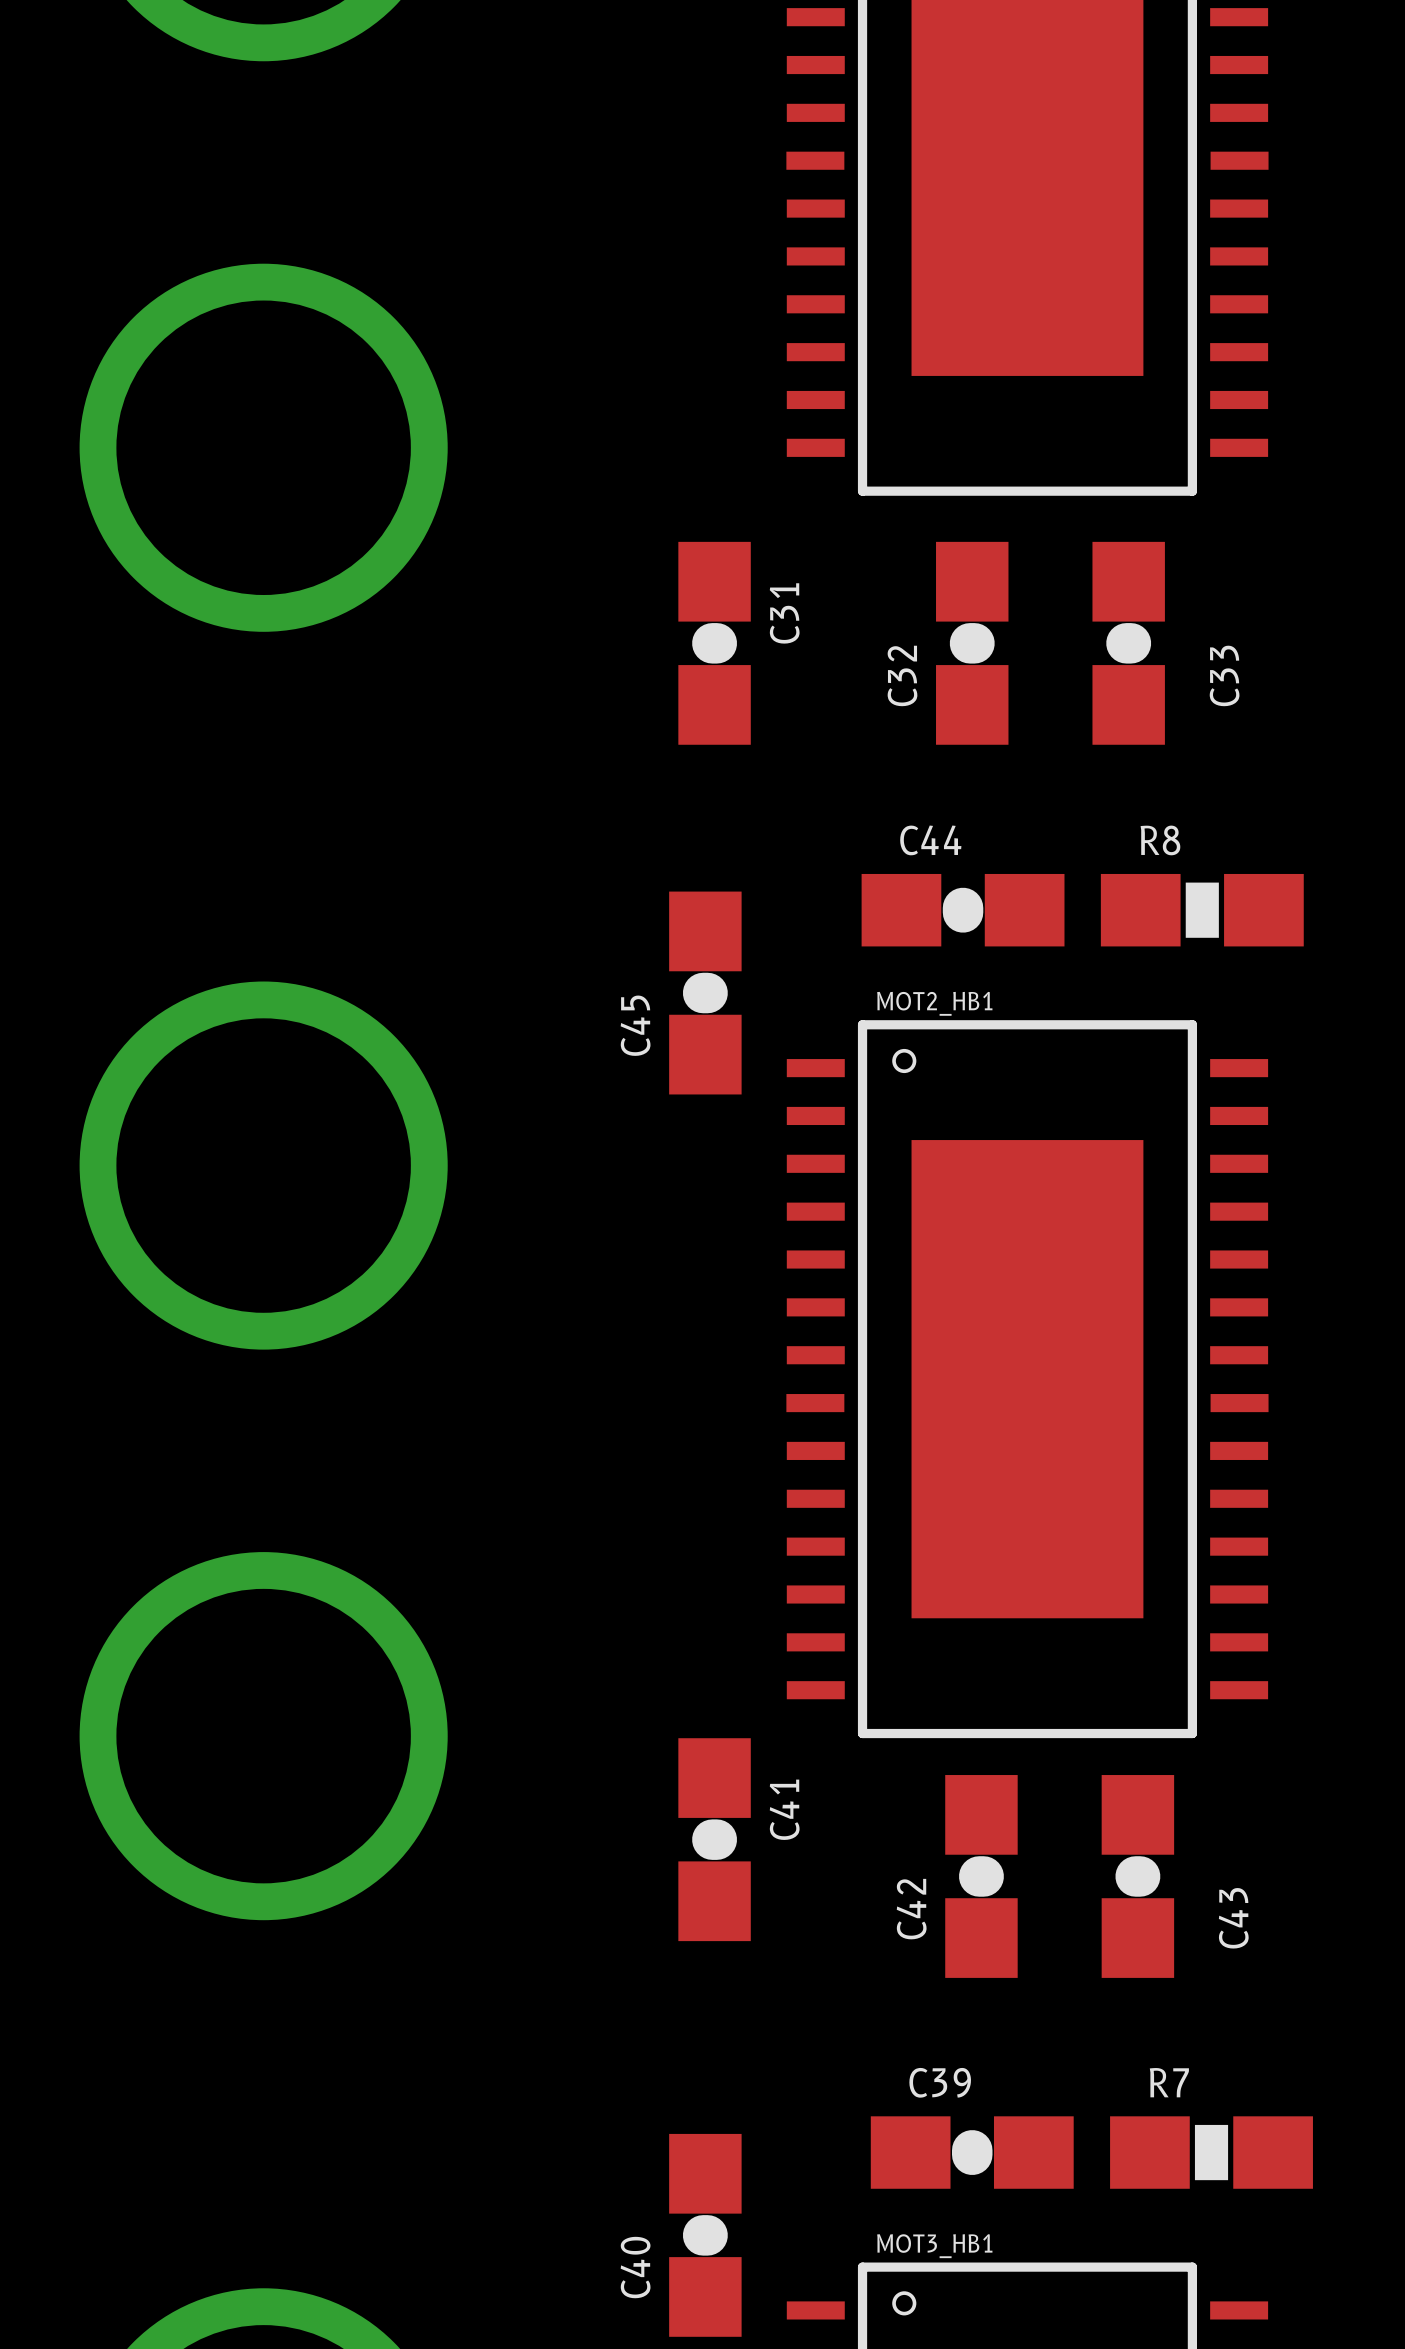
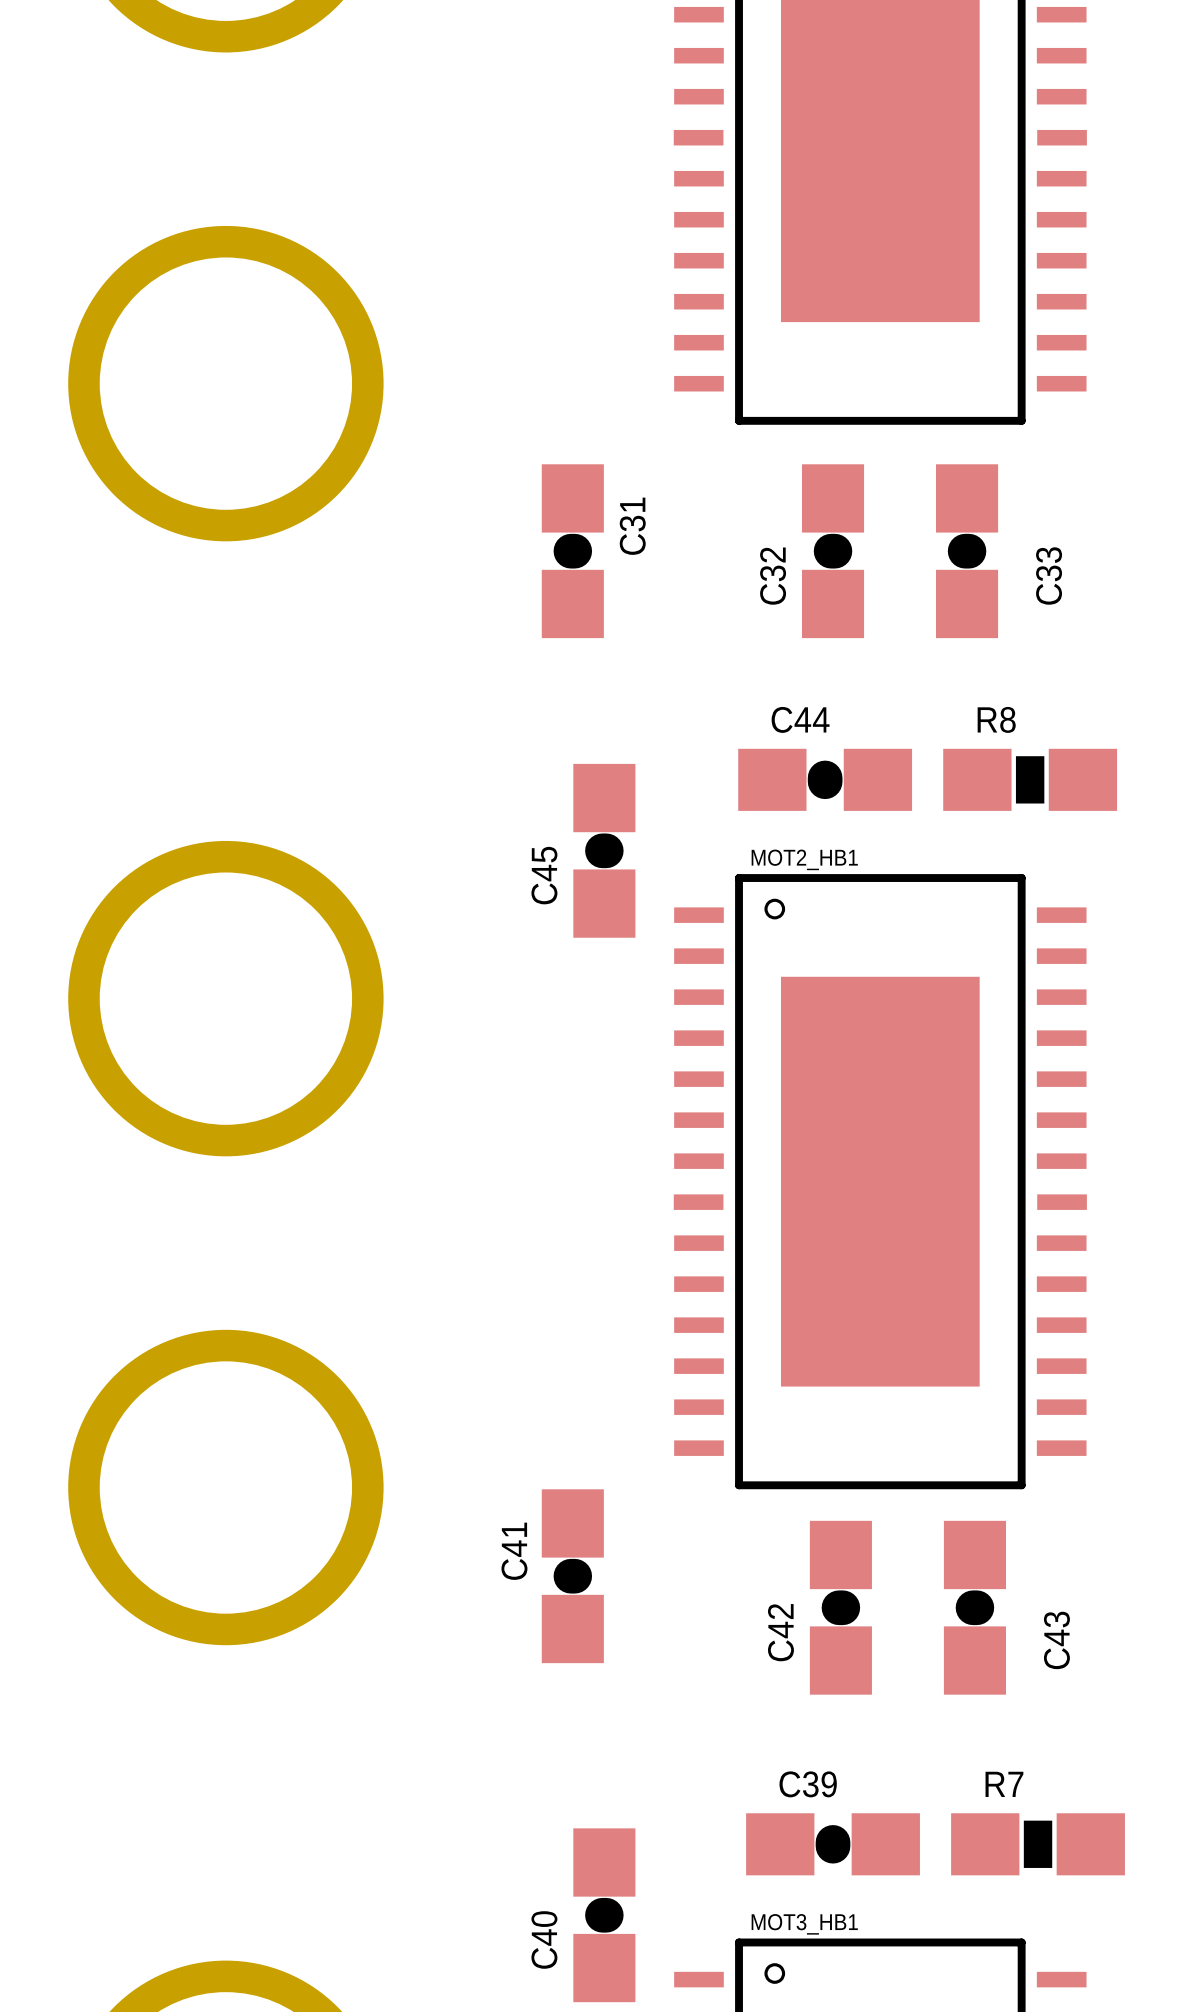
C31 position: (714, 643) -> (572, 551)
C41 name position: C41 (784, 1809) -> C41 (514, 1551)
C41 position: (714, 1839) -> (572, 1576)

